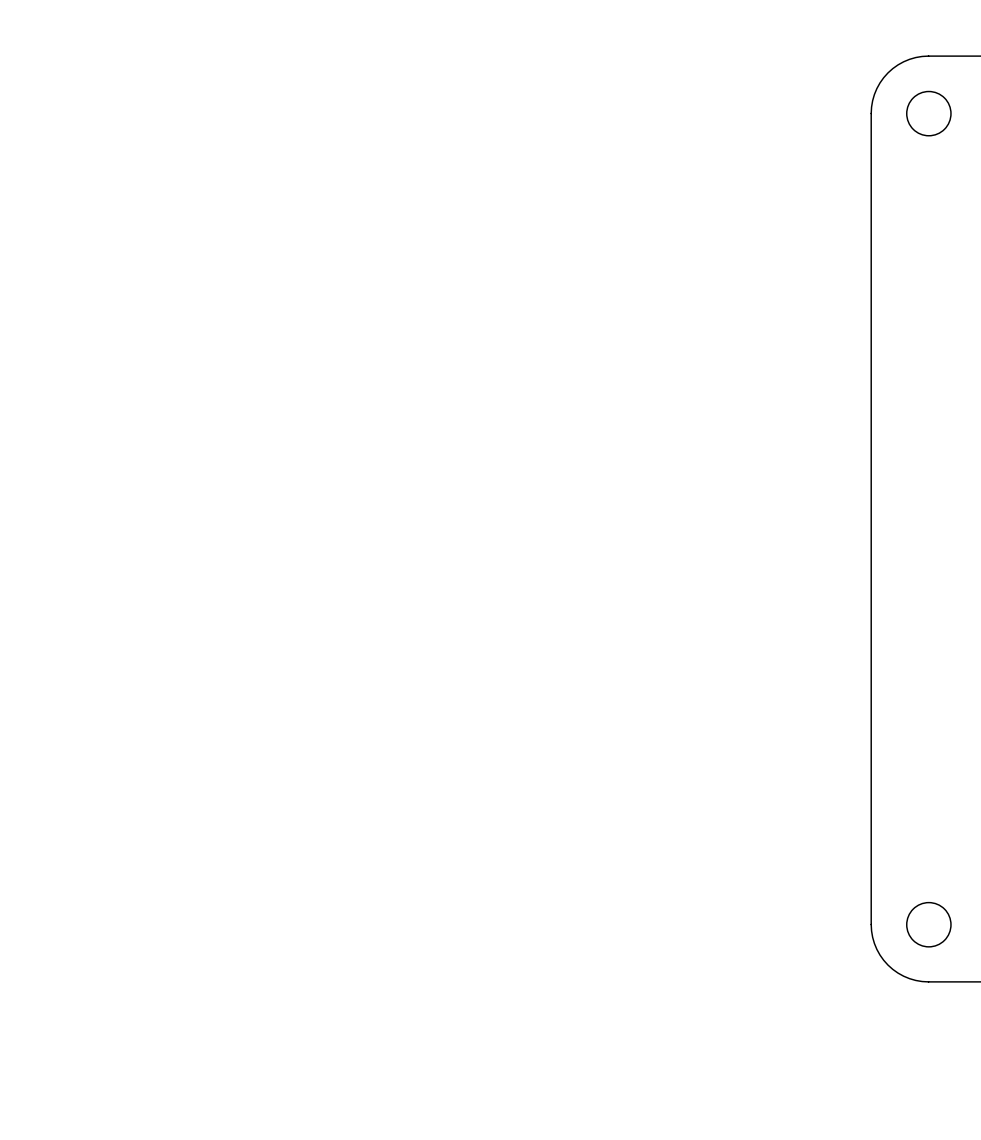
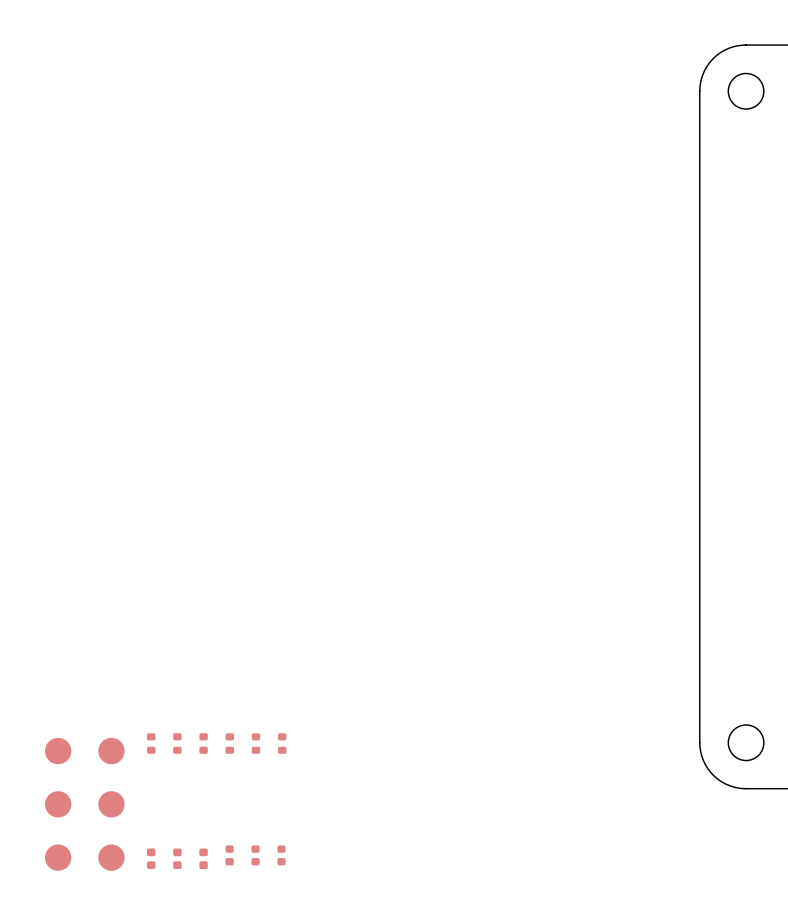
part: none -> (151, 743)
part: none -> (177, 743)
part: none -> (203, 743)
part: none -> (229, 743)
part: none -> (255, 743)
part: none -> (282, 743)
part: none -> (58, 751)
part: none -> (111, 751)
part: none -> (58, 804)
part: none -> (111, 804)
part: none -> (229, 855)
part: none -> (255, 855)
part: none -> (281, 855)
part: none -> (58, 857)
part: none -> (111, 857)
part: none -> (151, 858)
part: none -> (177, 858)
part: none -> (203, 858)

